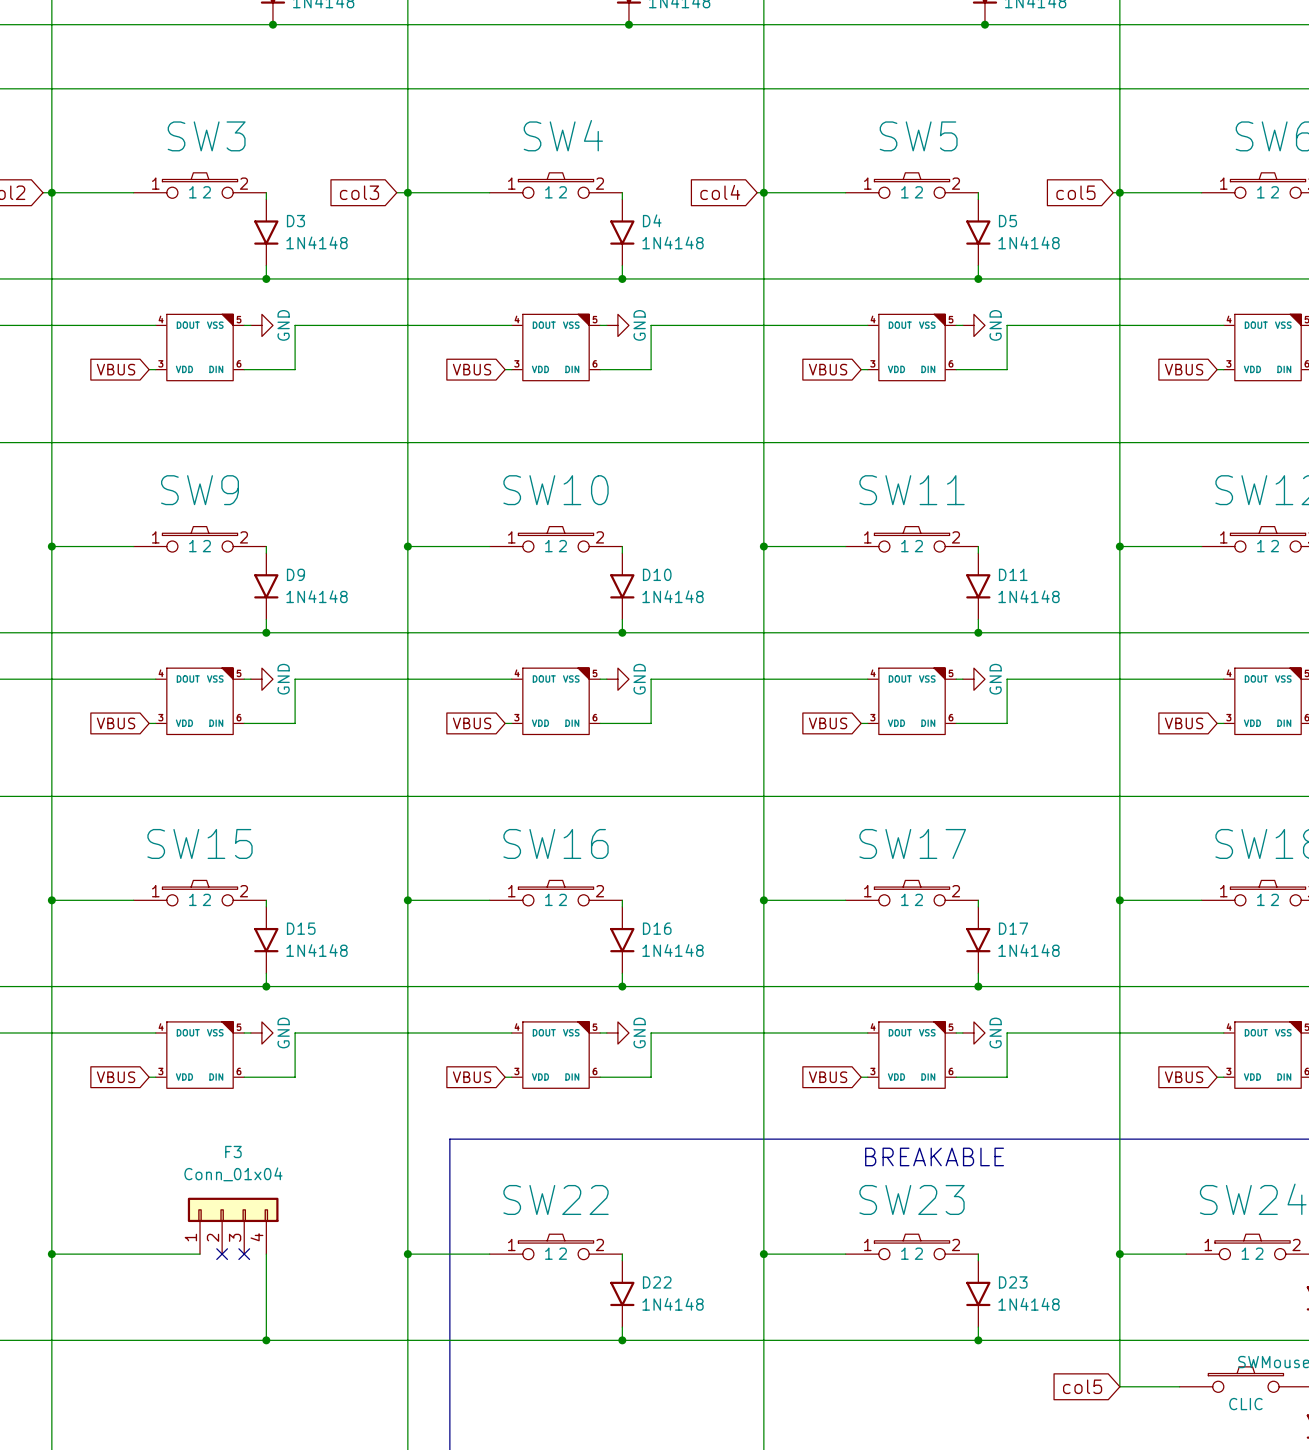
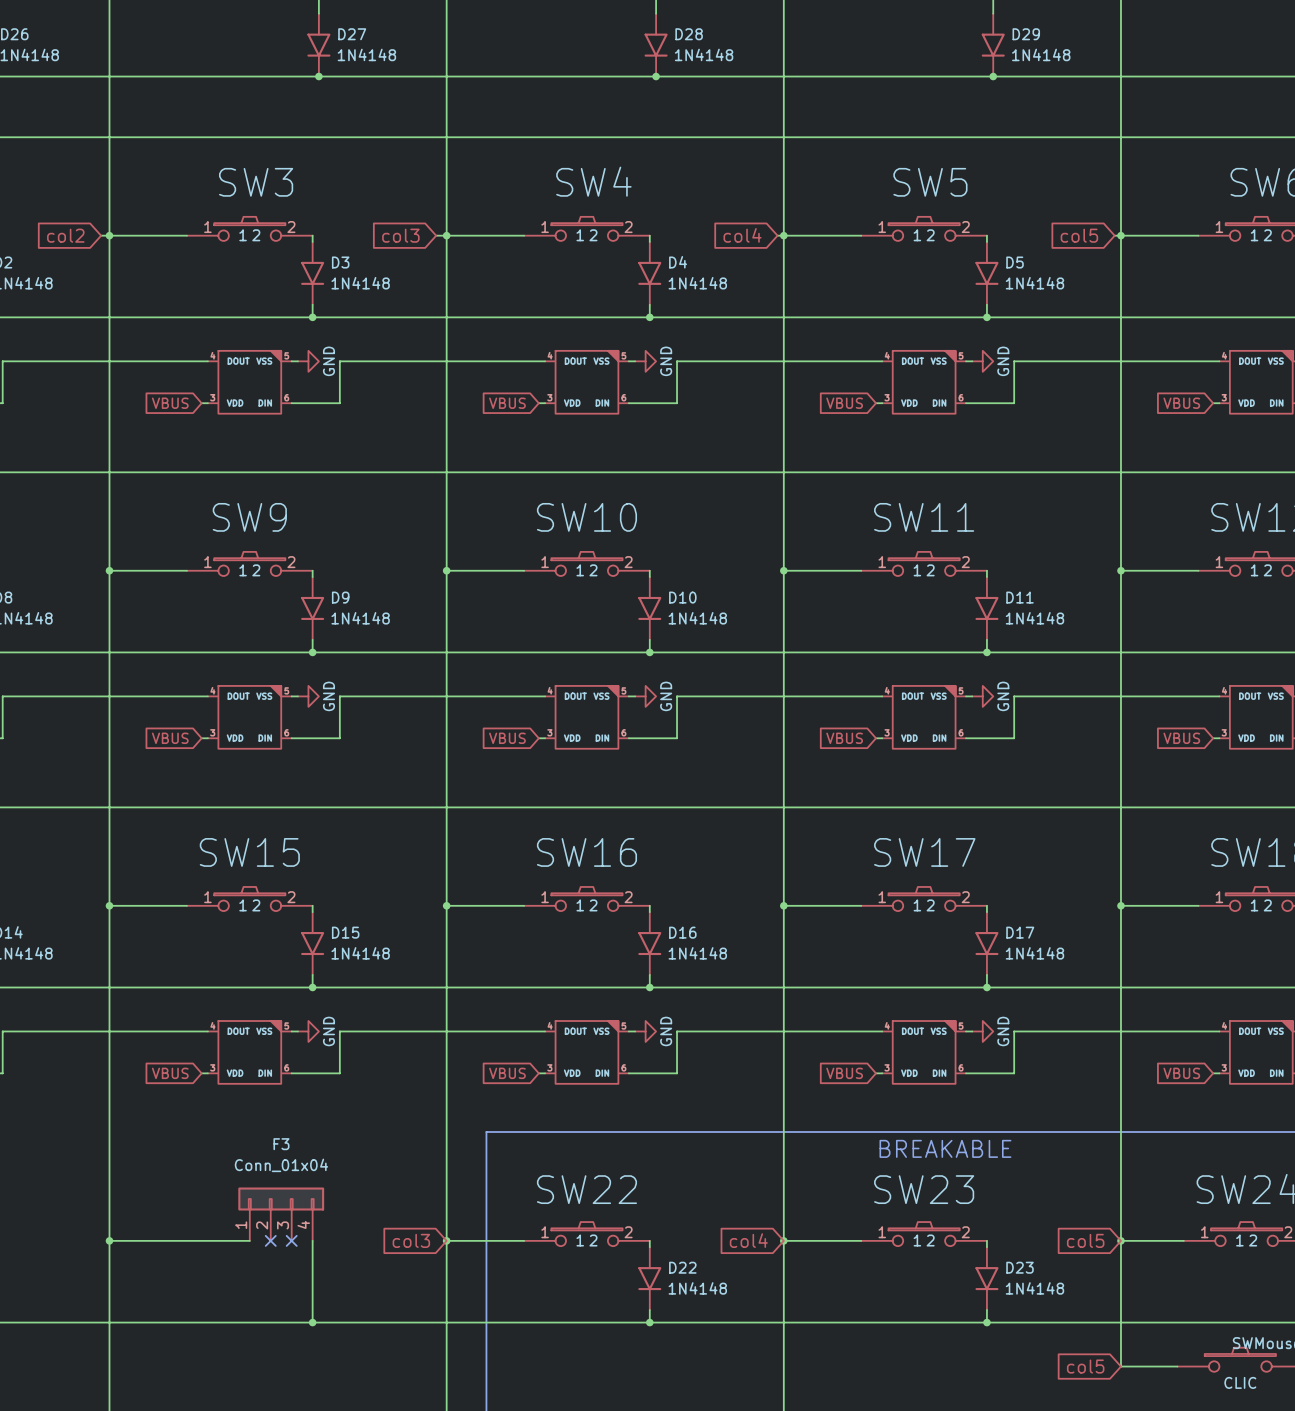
global label: none -> col4 (748, 1240)
global label: none -> col3 (411, 1240)
global label: none -> col5 (1085, 1240)

